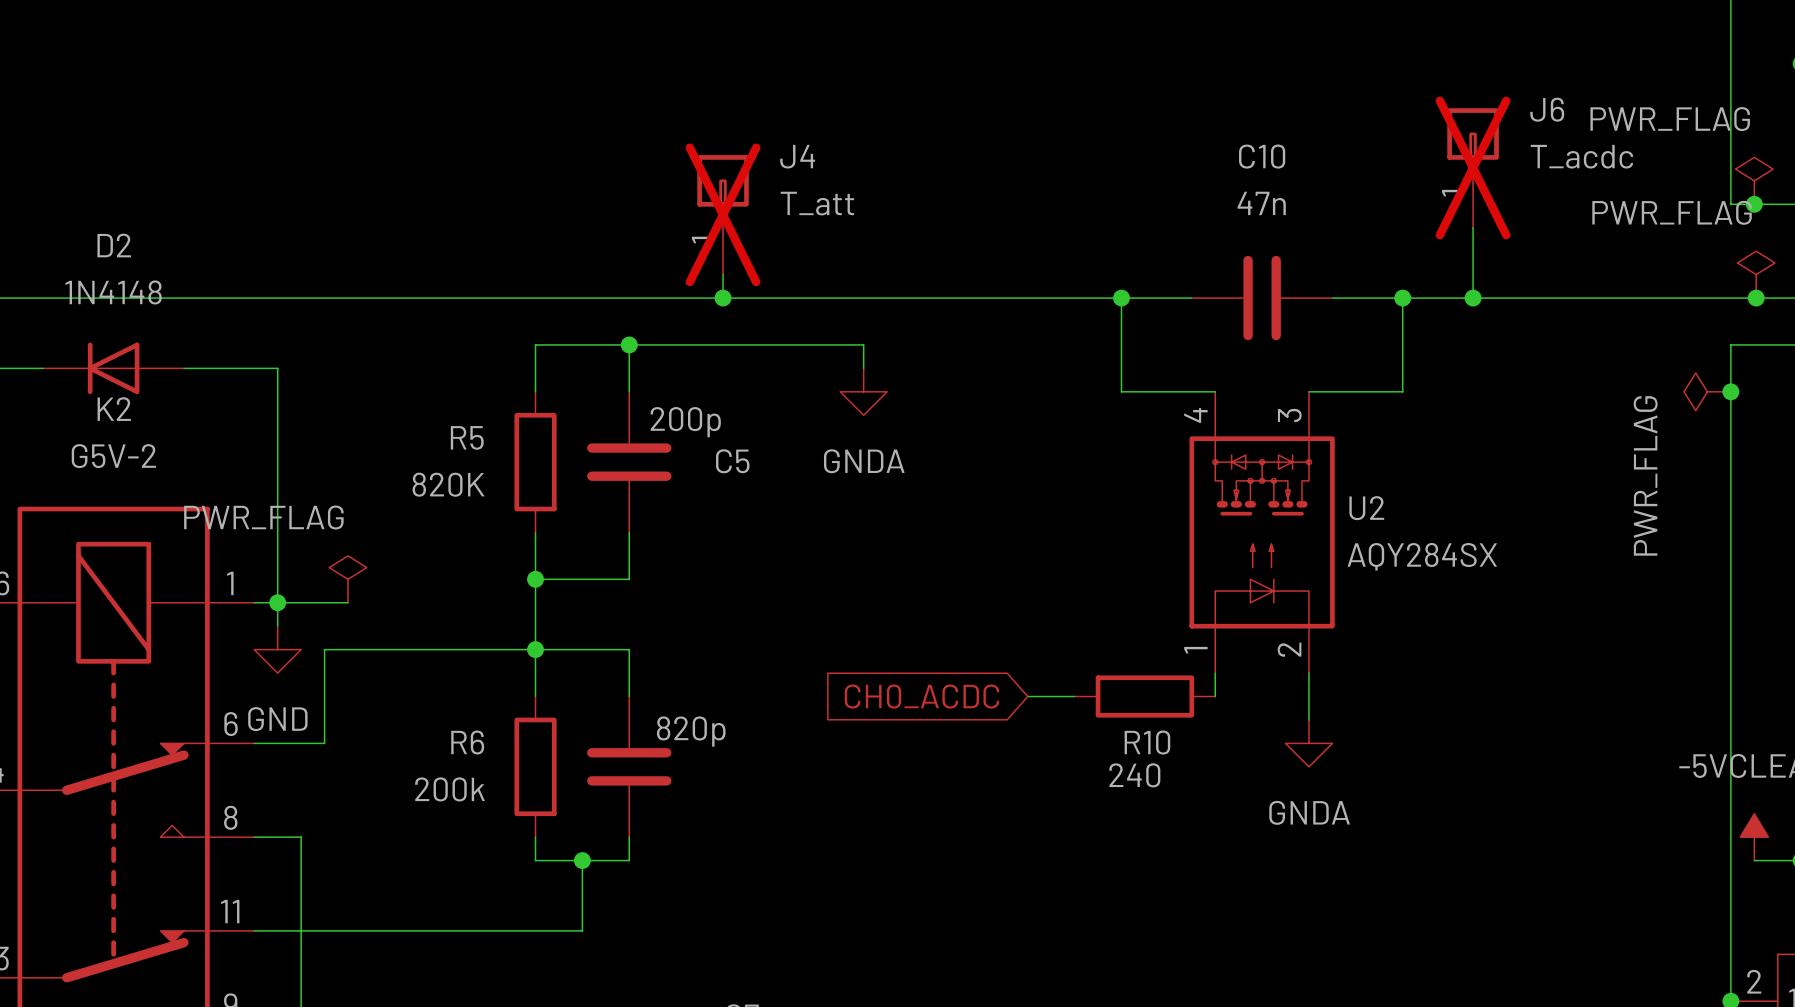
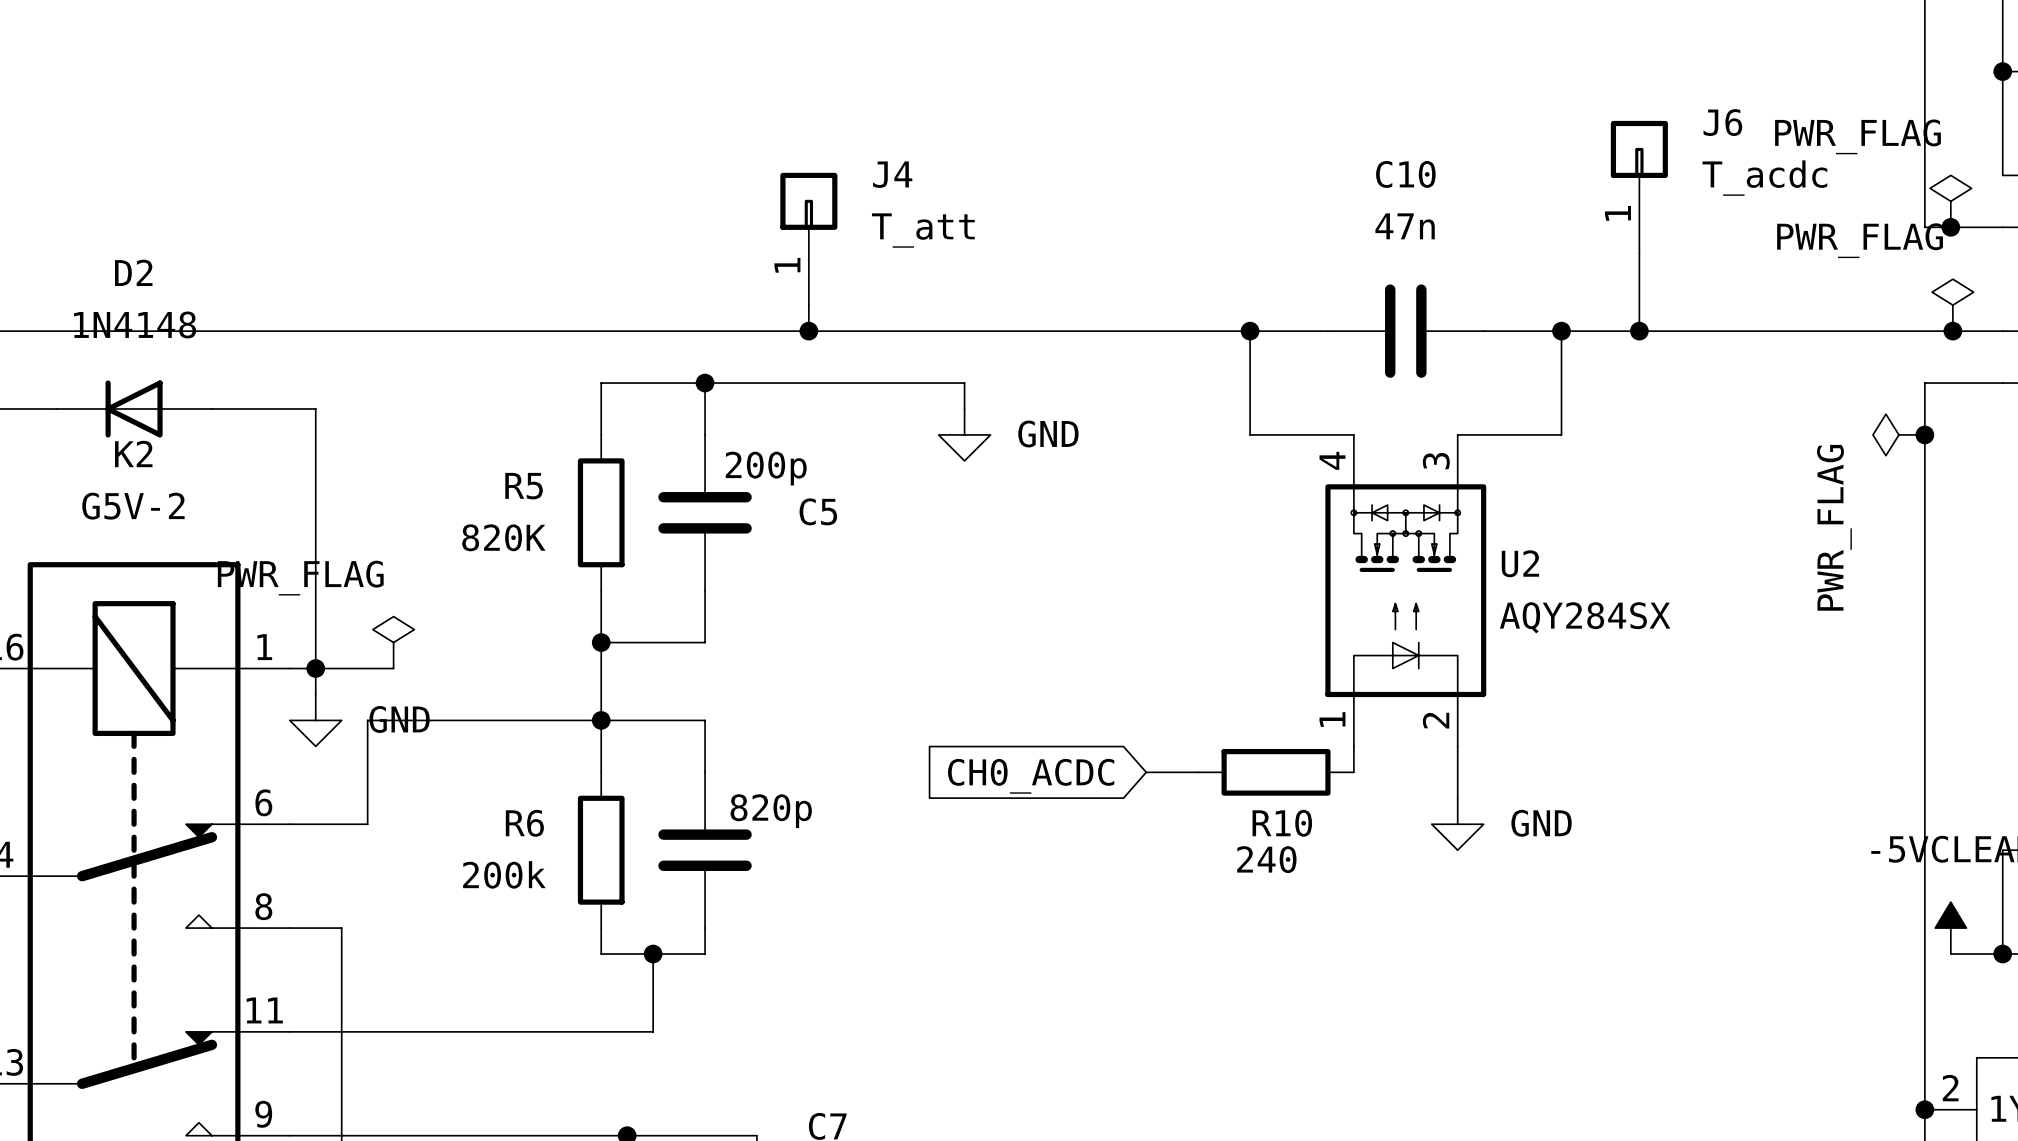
J6 do-not-place cross: (1473, 167) -> none
J4 do-not-place cross: (723, 214) -> none
power symbol: GNDA (863, 391) -> GND (964, 434)
power symbol text position: GND (277, 719) -> GND (399, 719)
power symbol: GNDA (1308, 743) -> GND (1457, 824)

